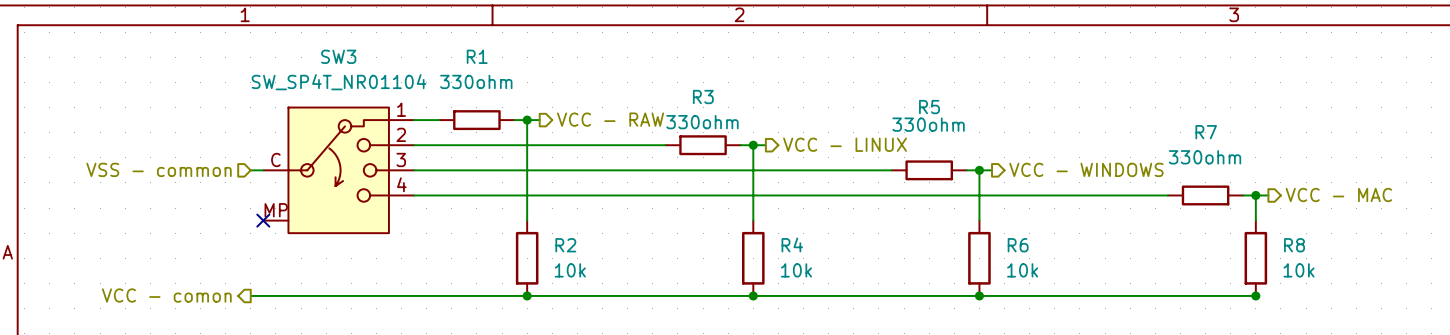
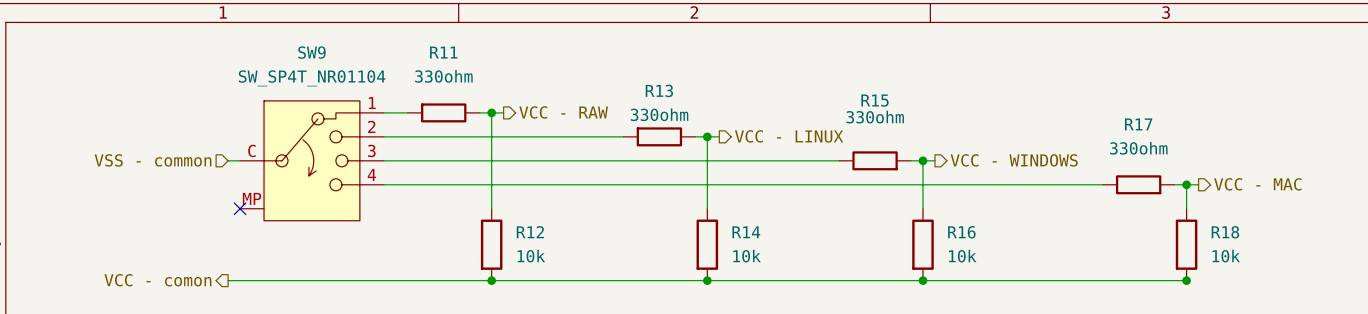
SW3 name: SW3 (338, 56) -> SW9 (311, 52)
R1 name: R1 (477, 56) -> R11 (443, 52)
R3 name: R3 (703, 97) -> R13 (659, 90)
R5 name: R5 (929, 107) -> R15 (874, 100)
R7 name: R7 (1206, 132) -> R17 (1138, 124)
R4 name: R4 (792, 244) -> R14 (746, 232)
R2 name: R2 (565, 245) -> R12 (530, 232)
R6 name: R6 (1018, 245) -> R16 (961, 232)
R8 name: R8 (1294, 245) -> R18 (1225, 232)

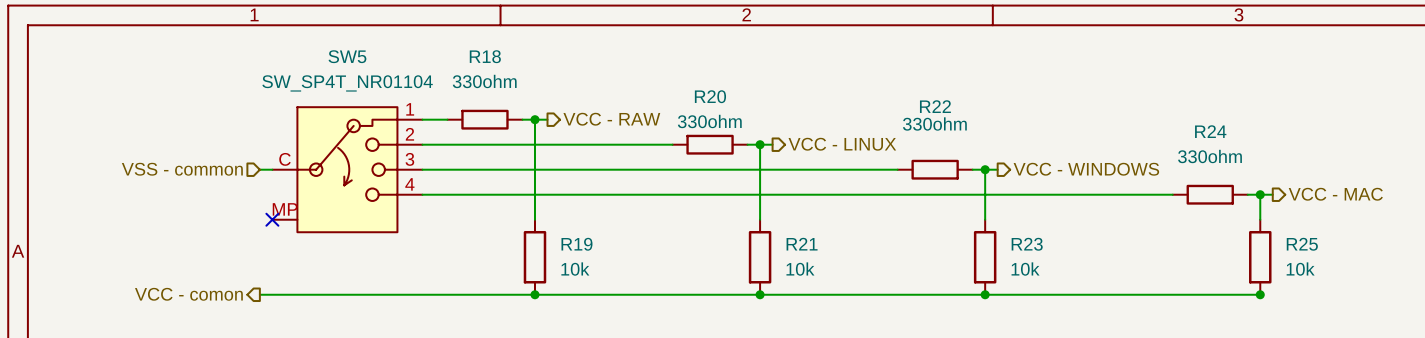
SW9 name: SW9 (311, 52) -> SW5 (347, 56)
R11 name: R11 (443, 52) -> R18 (485, 56)
R13 name: R13 (659, 90) -> R20 (710, 96)
R15 name: R15 (874, 100) -> R22 (935, 106)
R17 name: R17 (1138, 124) -> R24 (1210, 131)
R12 name: R12 (530, 232) -> R19 (576, 244)
R14 name: R14 (746, 232) -> R21 (802, 244)
R16 name: R16 (961, 232) -> R23 (1027, 244)
R18 name: R18 (1225, 232) -> R25 (1302, 244)

